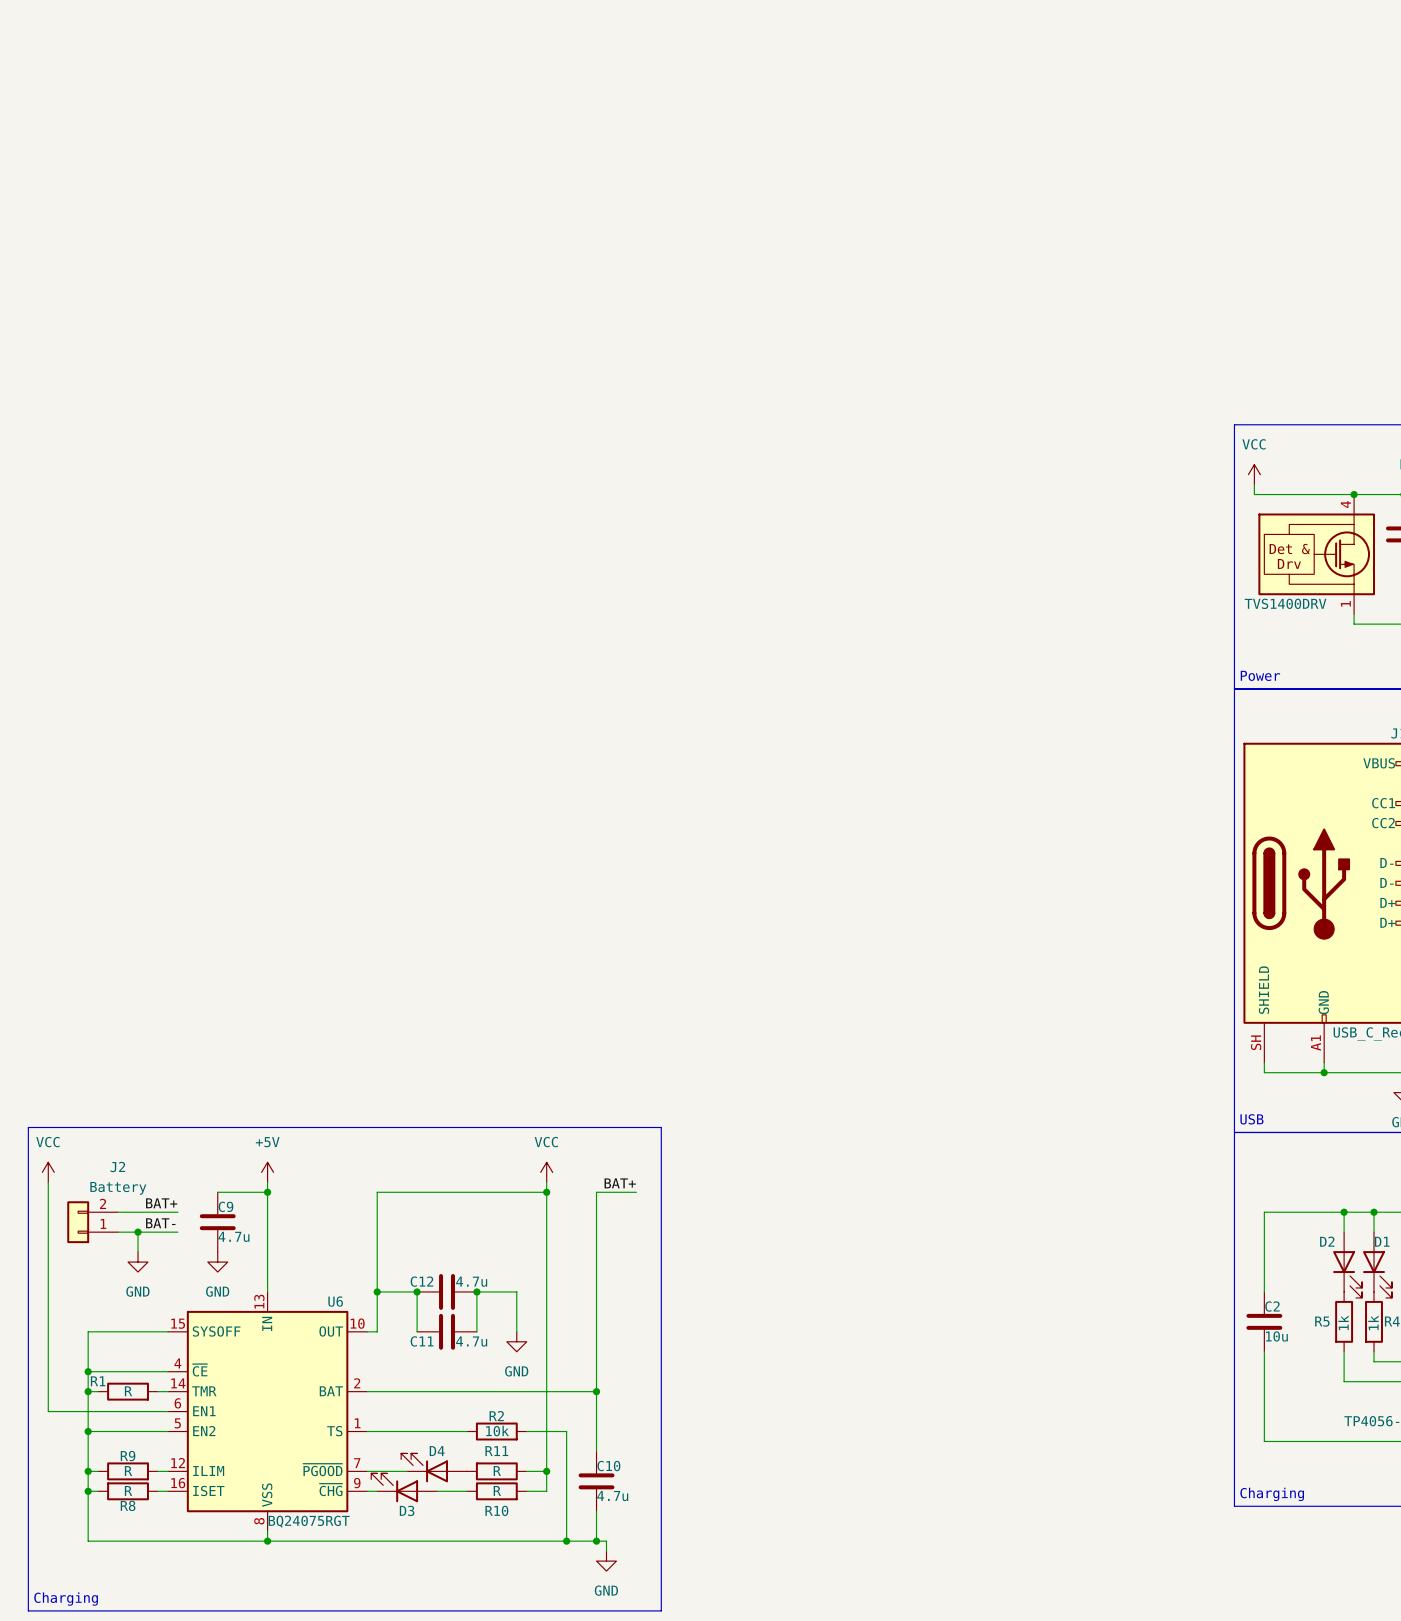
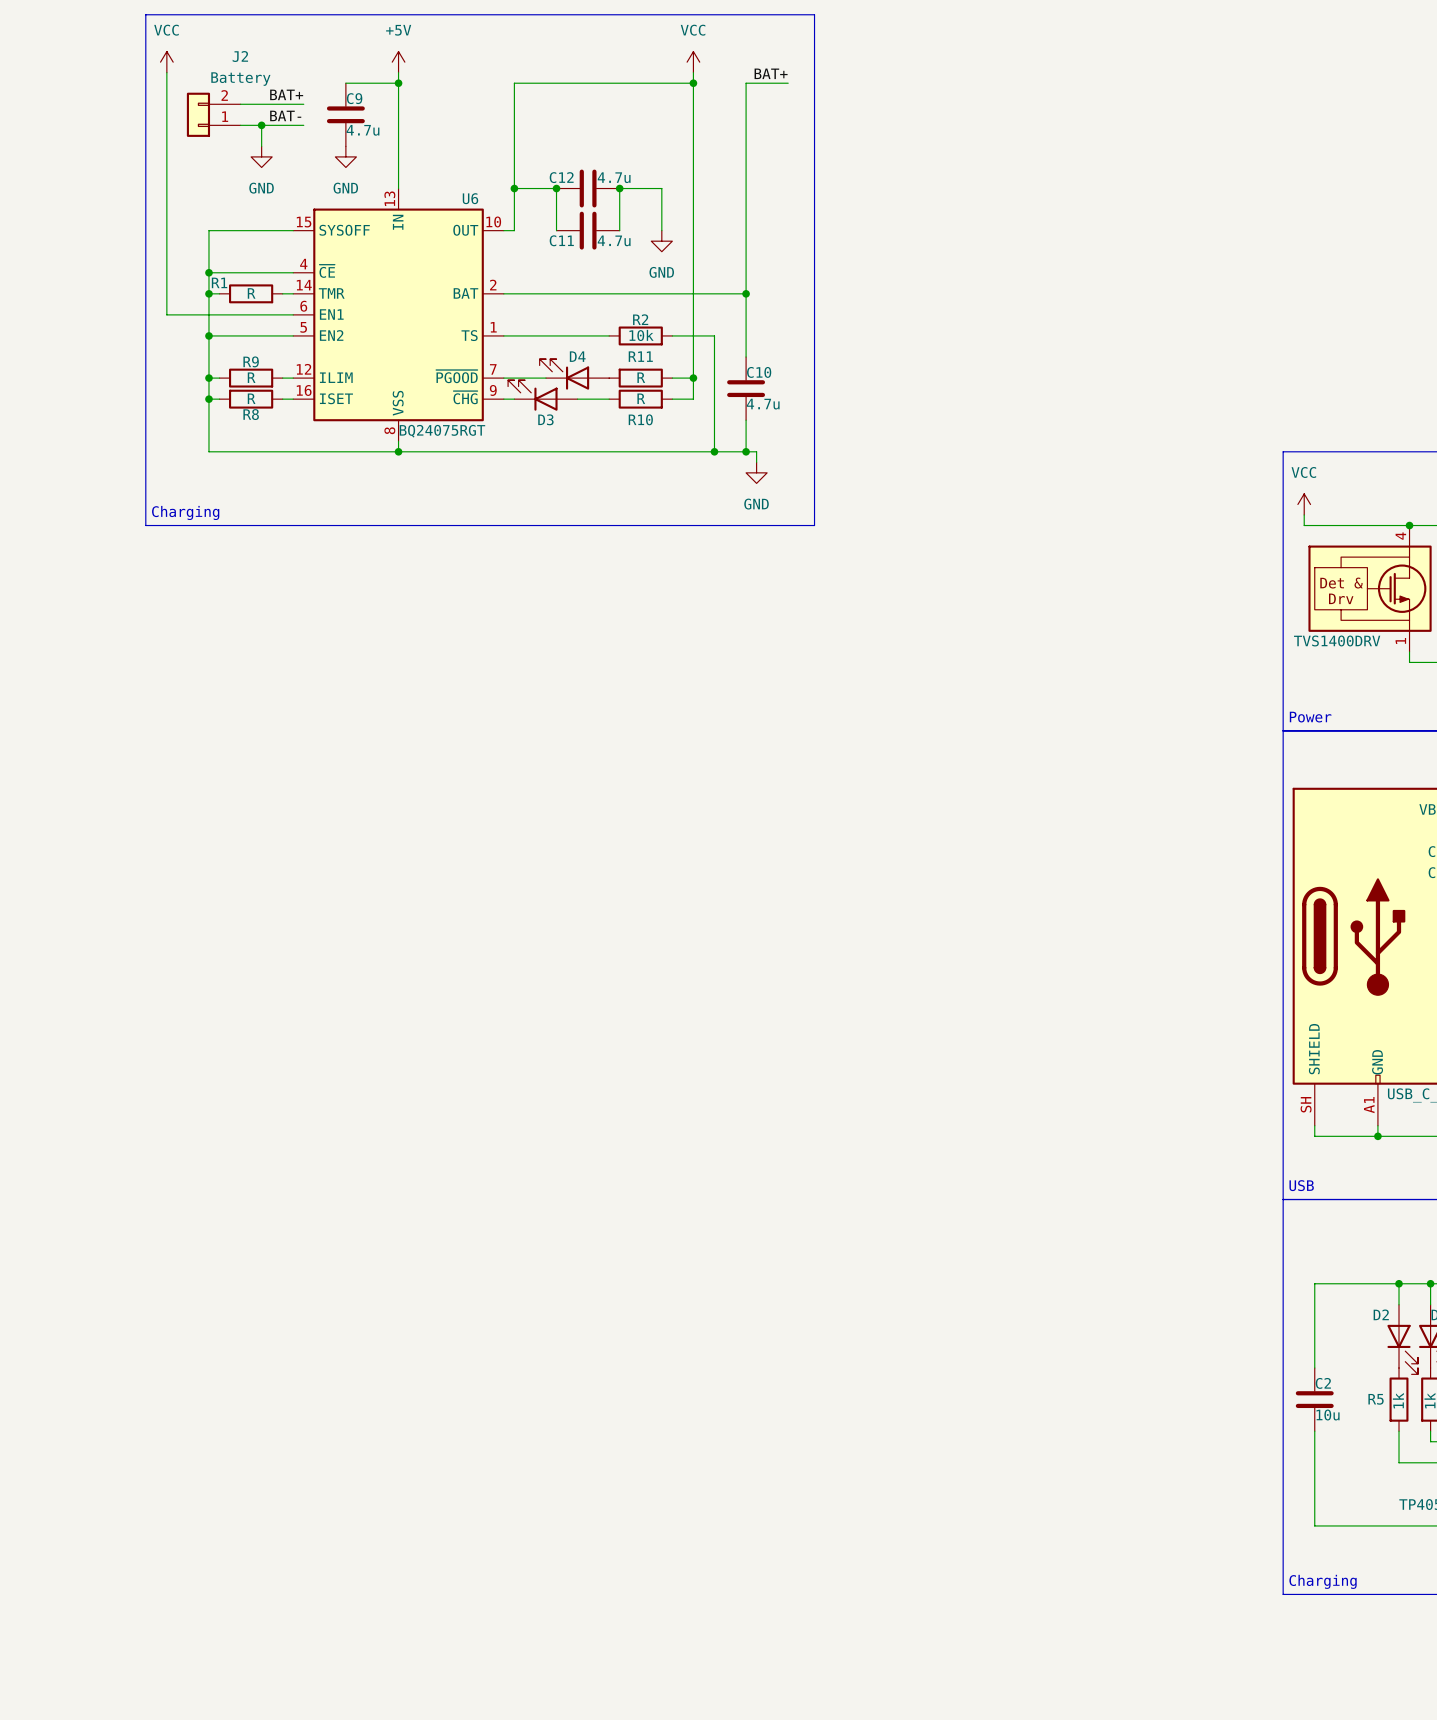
line: none -> (145, 14) (814, 14) (814, 525) (145, 525) (145, 14)
power symbol: none -> VCC (166, 62)
power symbol: none -> +5V (398, 62)
power symbol: none -> VCC (693, 62)
wire: none -> (166, 72) (166, 314) (293, 314)
wire: none -> (398, 72) (398, 188)
wire: none -> (693, 72) (693, 399) (672, 399)
label: none -> BAT+ (771, 73)
wire: none -> (345, 83) (398, 83)
junction: none -> (398, 83)
wire: none -> (693, 83) (514, 83) (514, 230) (503, 230)
junction: none -> (693, 83)
wire: none -> (788, 83) (746, 83) (746, 357)
label: none -> BAT+ (286, 94)
wire: none -> (240, 104) (303, 104)
label: none -> BAT- (285, 115)
wire: none -> (240, 125) (303, 125)
wire: none -> (261, 125) (261, 146)
junction: none -> (261, 125)
power symbol: none -> GND (261, 156)
power symbol: none -> GND (345, 156)
wire: none -> (514, 188) (556, 188) (556, 230)
junction: none -> (514, 188)
junction: none -> (556, 188)
junction: none -> (619, 188)
wire: none -> (293, 230) (208, 230) (208, 451) (756, 451) (756, 462)
wire: none -> (619, 230) (619, 188) (661, 188) (661, 230)
power symbol: none -> GND (661, 241)
wire: none -> (208, 272) (293, 272)
junction: none -> (208, 272)
wire: none -> (208, 293) (219, 293)
junction: none -> (208, 293)
wire: none -> (282, 293) (293, 293)
wire: none -> (503, 293) (746, 293)
junction: none -> (746, 293)
wire: none -> (208, 335) (293, 335)
junction: none -> (208, 335)
wire: none -> (503, 335) (609, 335)
wire: none -> (672, 335) (714, 335) (714, 451)
wire: none -> (208, 378) (219, 378)
junction: none -> (208, 378)
wire: none -> (282, 378) (293, 378)
wire: none -> (503, 378) (545, 378)
wire: none -> (672, 378) (693, 378)
junction: none -> (693, 378)
wire: none -> (208, 399) (219, 399)
junction: none -> (208, 399)
wire: none -> (282, 399) (293, 399)
wire: none -> (503, 399) (514, 399)
wire: none -> (577, 399) (609, 399)
wire: none -> (746, 420) (746, 451)
wire: none -> (398, 441) (398, 451)
junction: none -> (398, 451)
junction: none -> (714, 451)
junction: none -> (746, 451)
power symbol: none -> GND (756, 472)
text: none -> Charging (185, 512)
line: (28, 1127) (661, 1127) (661, 1610) (28, 1610) (28, 1127) -> none
power symbol: VCC (48, 1172) -> none
power symbol: +5V (267, 1172) -> none
power symbol: VCC (546, 1172) -> none
wire: (48, 1182) (48, 1411) (167, 1411) -> none
wire: (267, 1182) (267, 1291) -> none
wire: (546, 1182) (546, 1491) (526, 1491) -> none
label: BAT+ (620, 1183) -> none
wire: (217, 1192) (267, 1192) -> none
junction: (267, 1192) -> none
wire: (546, 1192) (377, 1192) (377, 1331) (367, 1331) -> none
junction: (546, 1192) -> none
wire: (636, 1192) (596, 1192) (596, 1451) -> none
label: BAT+ (161, 1203) -> none
wire: (118, 1212) (177, 1212) -> none
J2 position: (92, 1222) -> (213, 114)
C9 position: (217, 1222) -> (345, 114)
label: BAT- (160, 1223) -> none
wire: (118, 1232) (177, 1232) -> none
wire: (138, 1232) (138, 1252) -> none
junction: (138, 1232) -> none
power symbol: GND (138, 1262) -> none
power symbol: GND (217, 1262) -> none
wire: (377, 1291) (417, 1291) (417, 1331) -> none
junction: (377, 1291) -> none
junction: (417, 1291) -> none
C12 position: (447, 1291) -> (588, 188)
junction: (476, 1291) -> none
wire: (167, 1331) (88, 1331) (88, 1541) (606, 1541) (606, 1551) -> none
C11 position: (447, 1331) -> (588, 230)
wire: (476, 1331) (476, 1291) (516, 1291) (516, 1331) -> none
power symbol: GND (516, 1341) -> none
wire: (88, 1371) (167, 1371) -> none
junction: (88, 1371) -> none
wire: (88, 1391) (98, 1391) -> none
junction: (88, 1391) -> none
R1 position: (128, 1391) -> (251, 293)
wire: (157, 1391) (167, 1391) -> none
wire: (367, 1391) (596, 1391) -> none
junction: (596, 1391) -> none
U6 position: (267, 1411) -> (398, 314)
wire: (88, 1431) (167, 1431) -> none
junction: (88, 1431) -> none
wire: (367, 1431) (466, 1431) -> none
R2 position: (496, 1431) -> (640, 335)
wire: (526, 1431) (566, 1431) (566, 1541) -> none
D4 position: (434, 1467) -> (574, 374)
wire: (88, 1471) (98, 1471) -> none
junction: (88, 1471) -> none
R9 position: (128, 1471) -> (251, 378)
wire: (157, 1471) (167, 1471) -> none
wire: (367, 1471) (407, 1471) -> none
R11 position: (496, 1471) -> (640, 378)
wire: (526, 1471) (546, 1471) -> none
junction: (546, 1471) -> none
C10 position: (596, 1481) -> (746, 388)
D3 position: (404, 1487) -> (542, 395)
wire: (88, 1491) (98, 1491) -> none
junction: (88, 1491) -> none
R8 position: (128, 1491) -> (251, 399)
wire: (157, 1491) (167, 1491) -> none
wire: (367, 1491) (377, 1491) -> none
wire: (437, 1491) (466, 1491) -> none
R10 position: (496, 1491) -> (640, 399)
wire: (596, 1511) (596, 1541) -> none
wire: (267, 1531) (267, 1541) -> none
junction: (267, 1541) -> none
junction: (566, 1541) -> none
junction: (596, 1541) -> none
power symbol: GND (606, 1561) -> none
text: Charging (66, 1599) -> none

